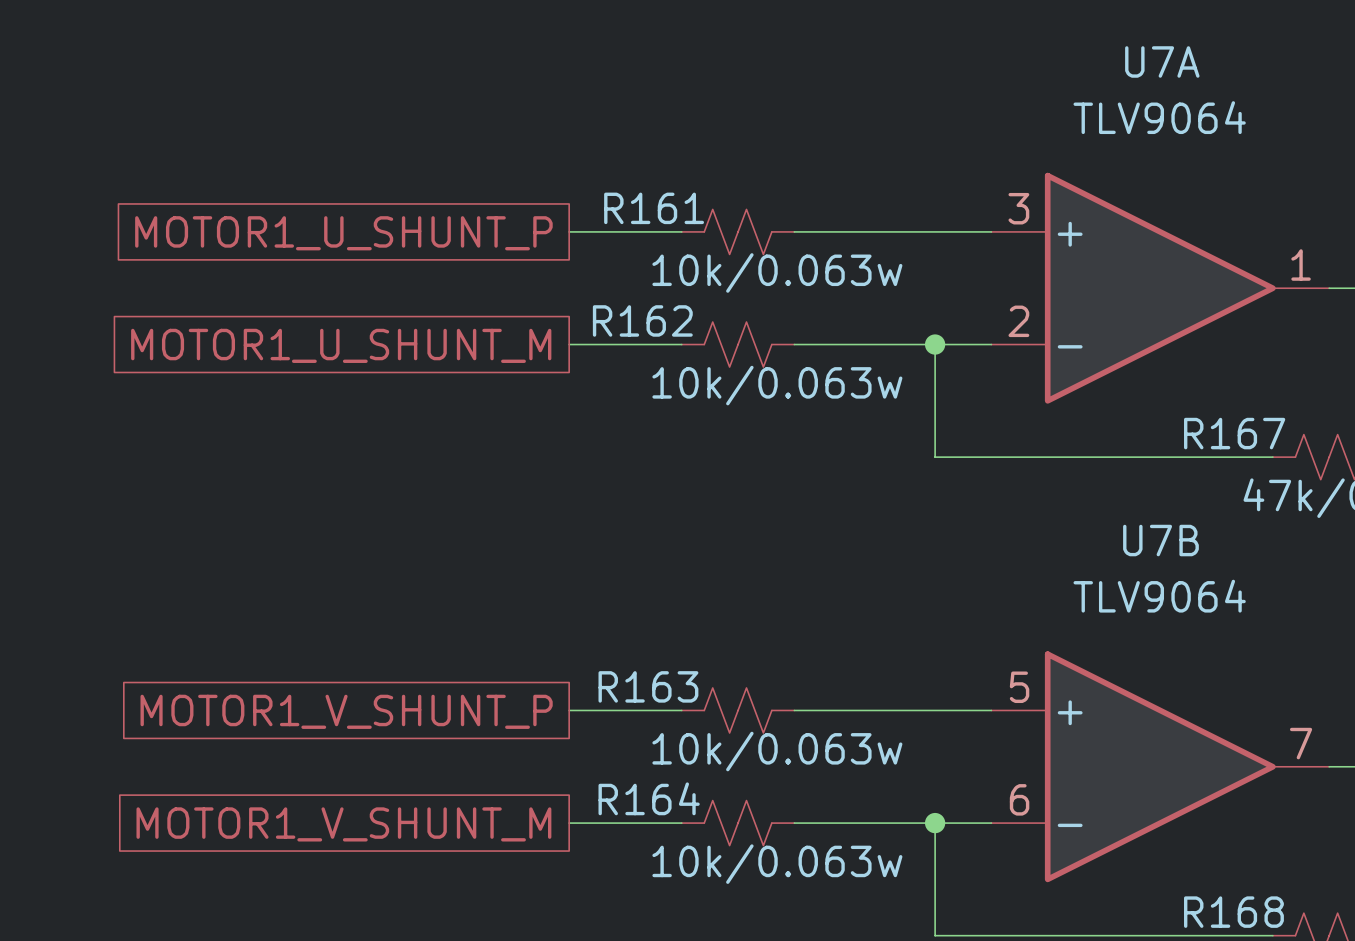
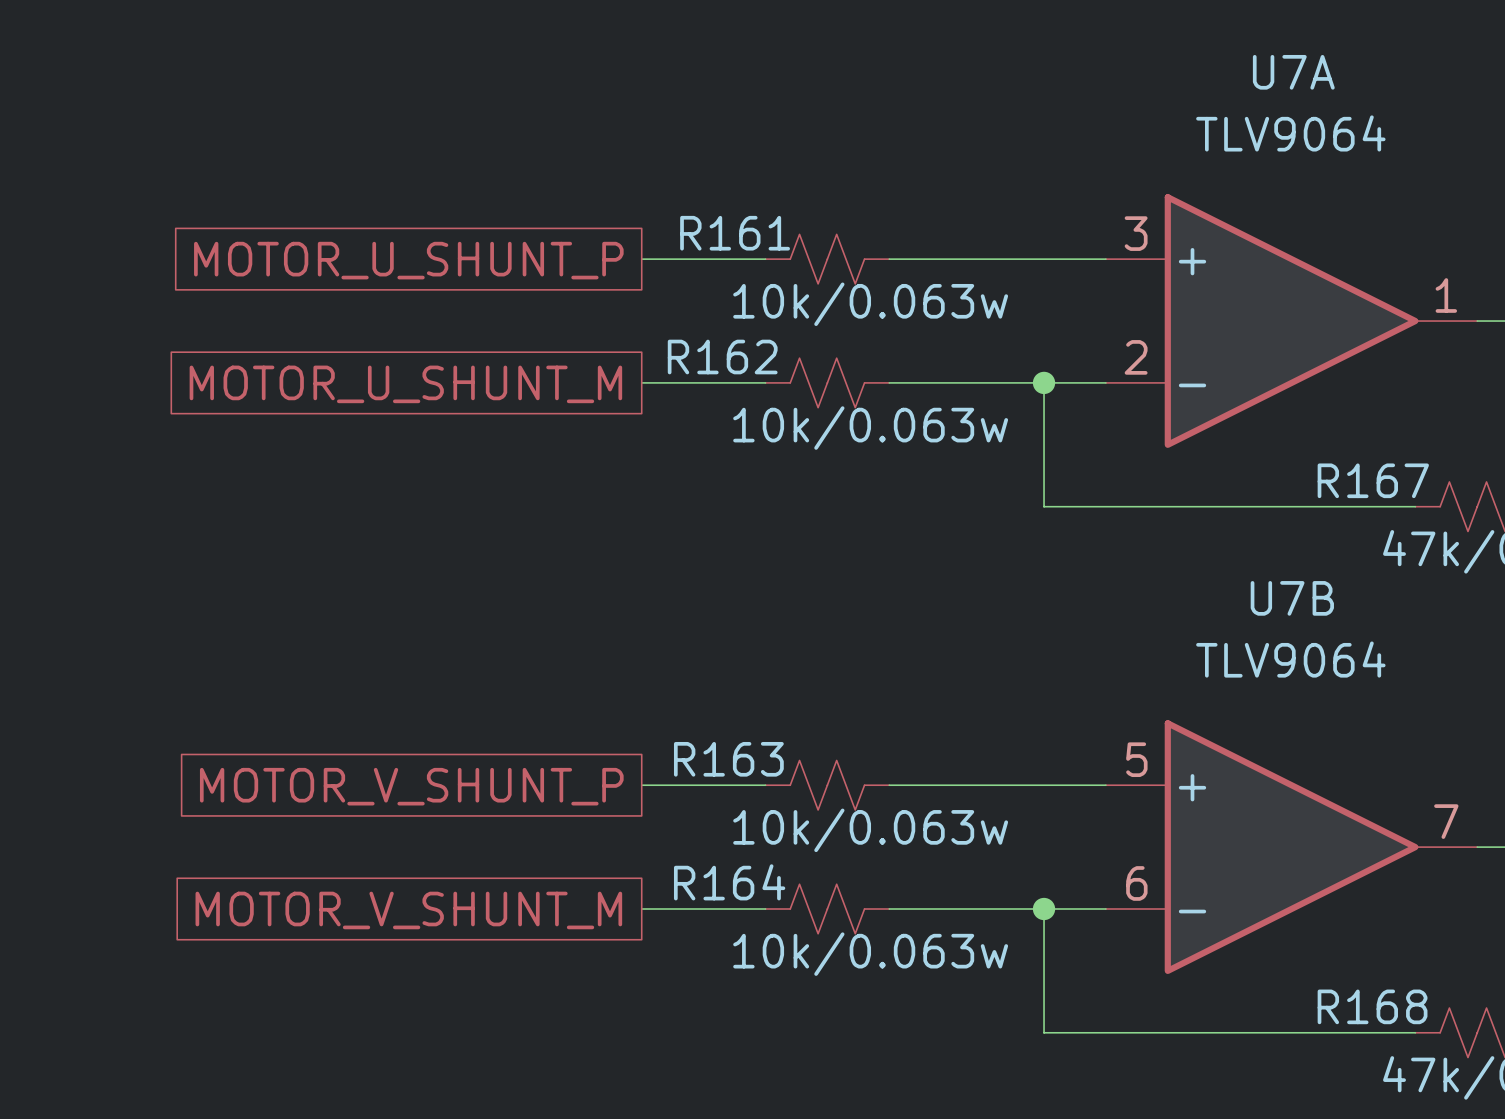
global label: MOTOR1_U_SHUNT_P (343, 233) -> MOTOR_U_SHUNT_P (408, 260)
global label: MOTOR1_U_SHUNT_M (341, 345) -> MOTOR_U_SHUNT_M (405, 384)
global label: MOTOR1_V_SHUNT_P (346, 711) -> MOTOR_V_SHUNT_P (411, 786)
global label: MOTOR1_V_SHUNT_M (343, 824) -> MOTOR_V_SHUNT_M (408, 910)

